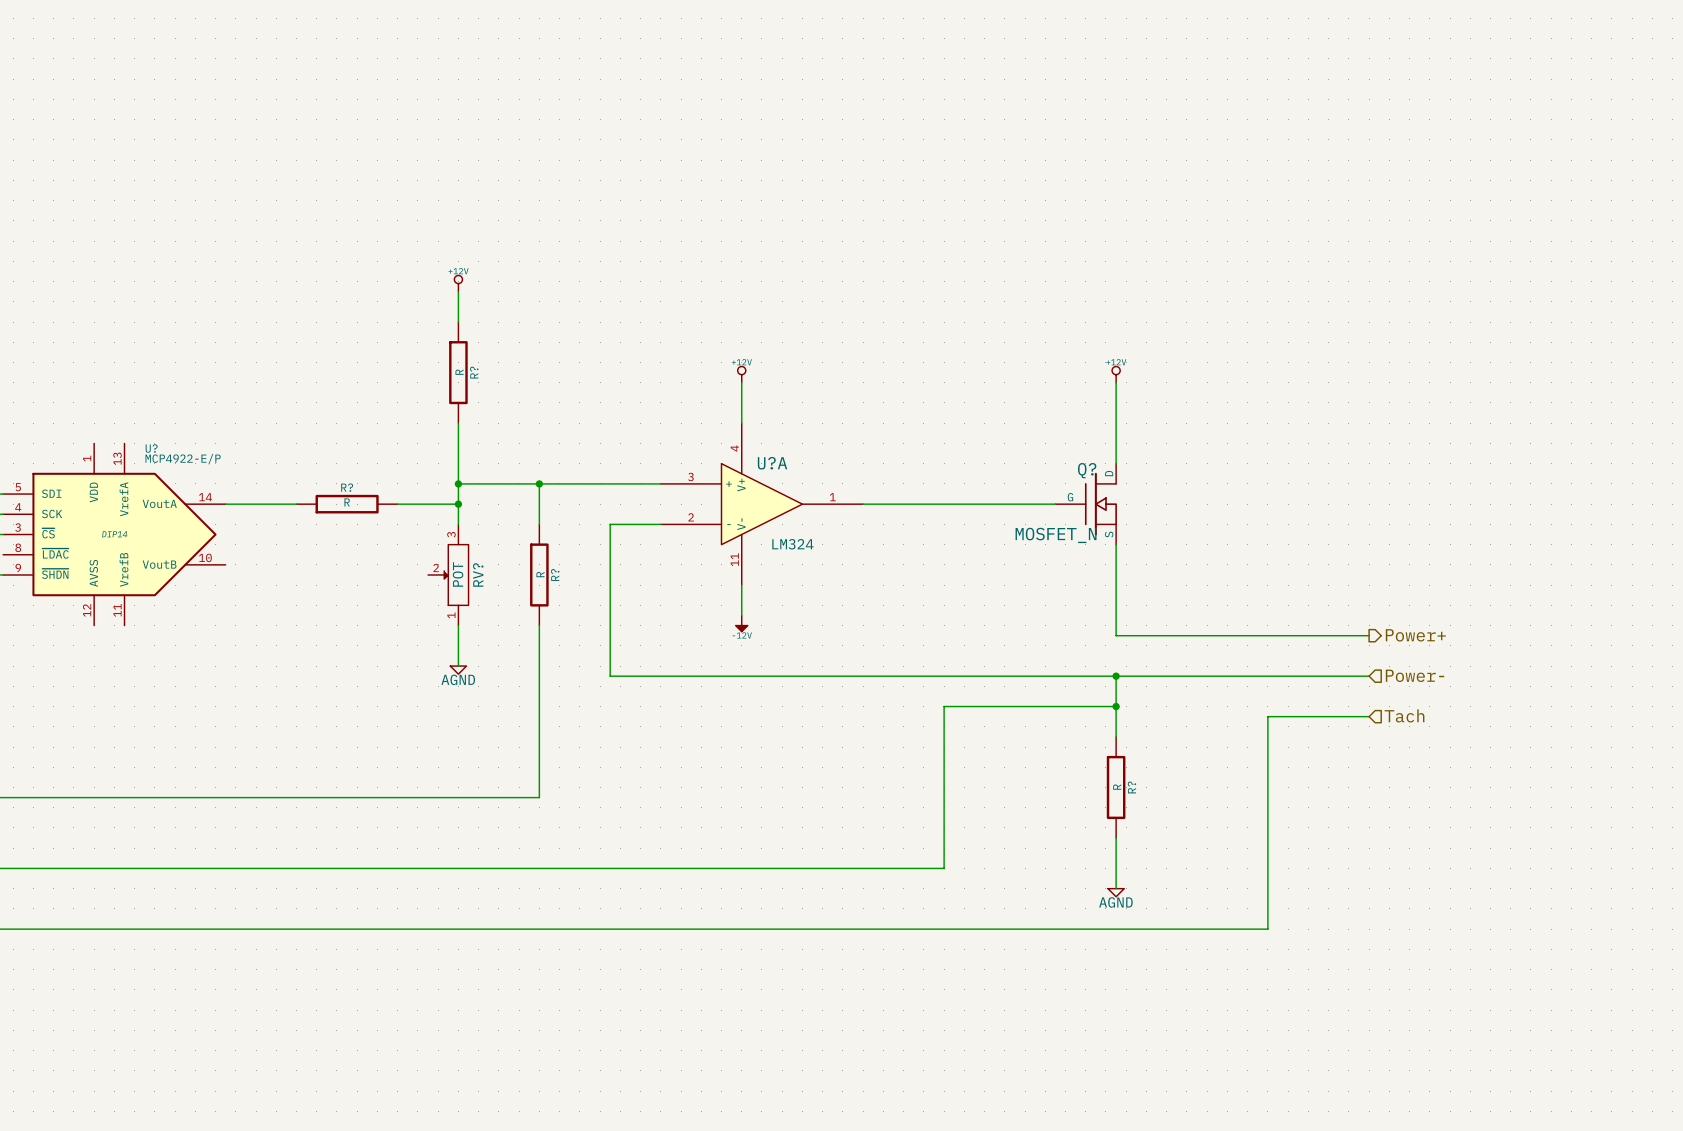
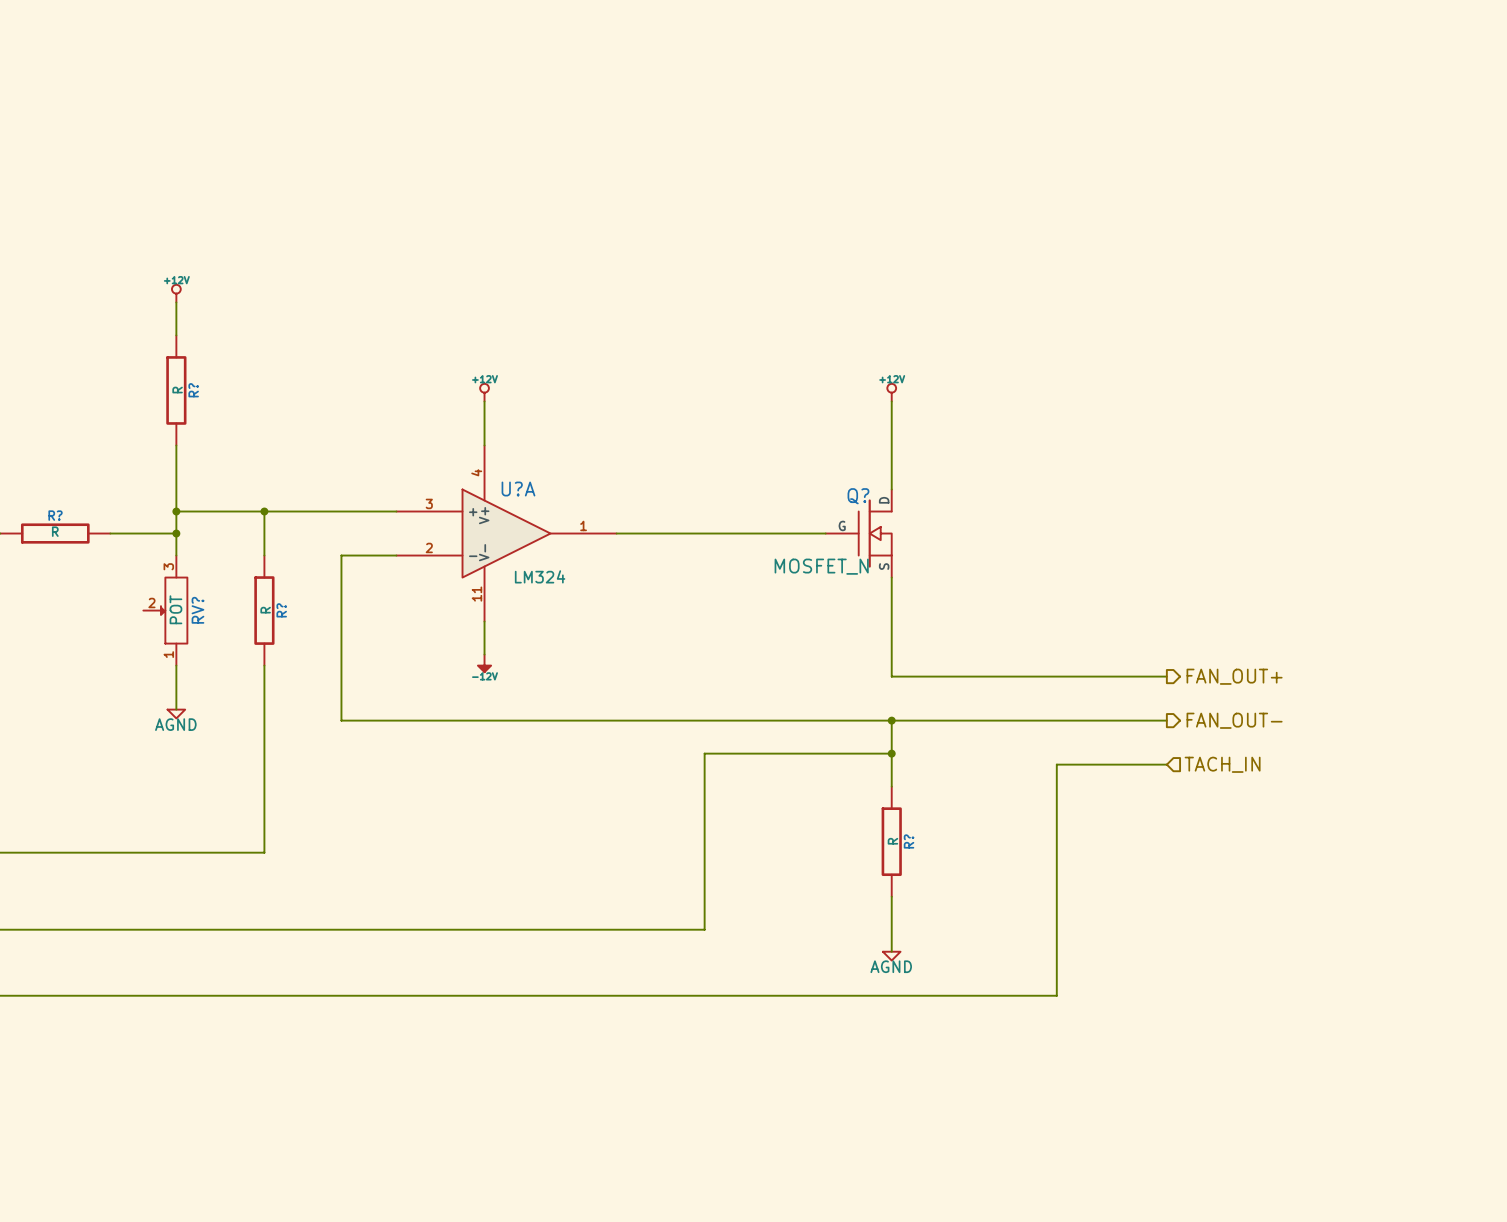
hierarchical label: Power+ (1415, 635) -> FAN_OUT+ (1234, 676)
hierarchical label shape: input (1415, 675) -> output (1234, 720)
hierarchical label: Power- (1415, 675) -> FAN_OUT- (1234, 720)
hierarchical label: Tach (1404, 715) -> TACH_IN (1222, 764)

